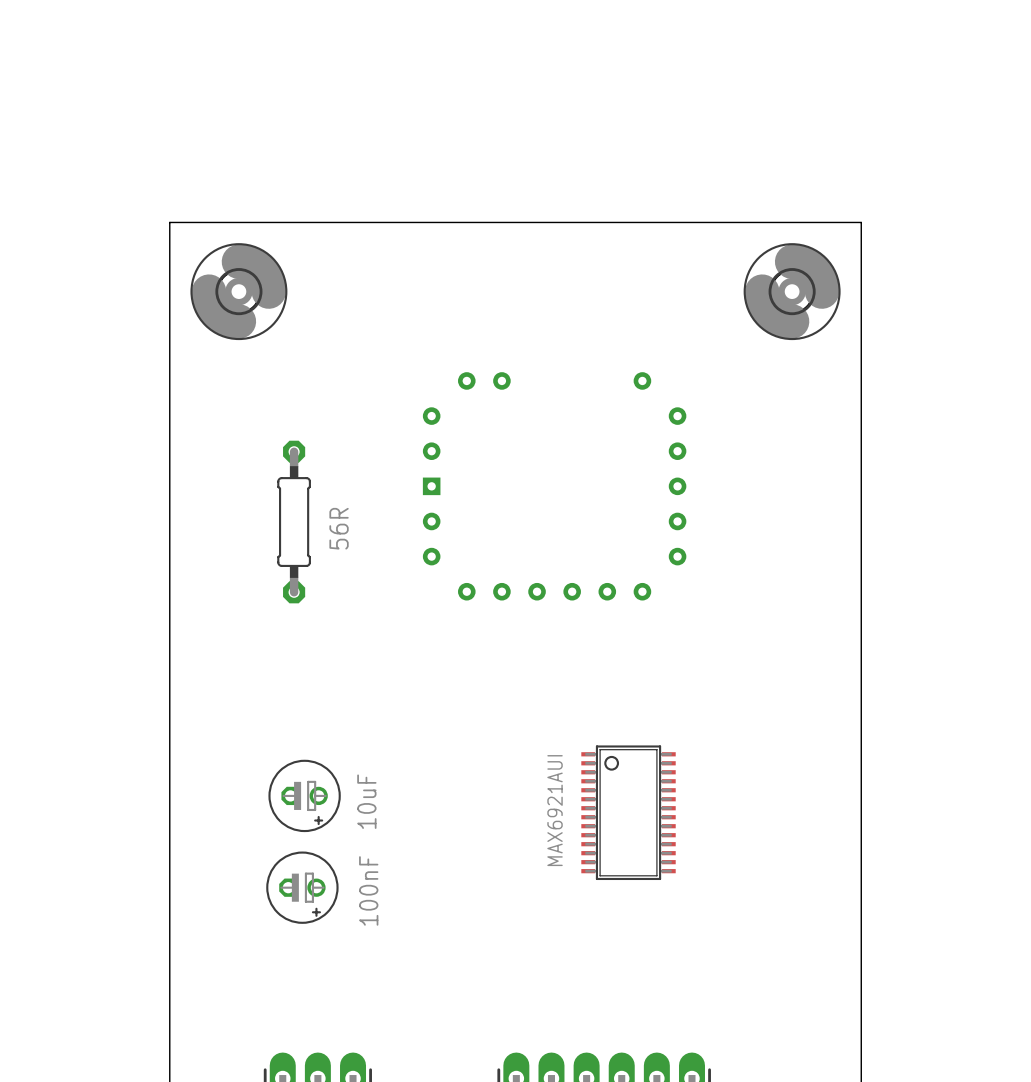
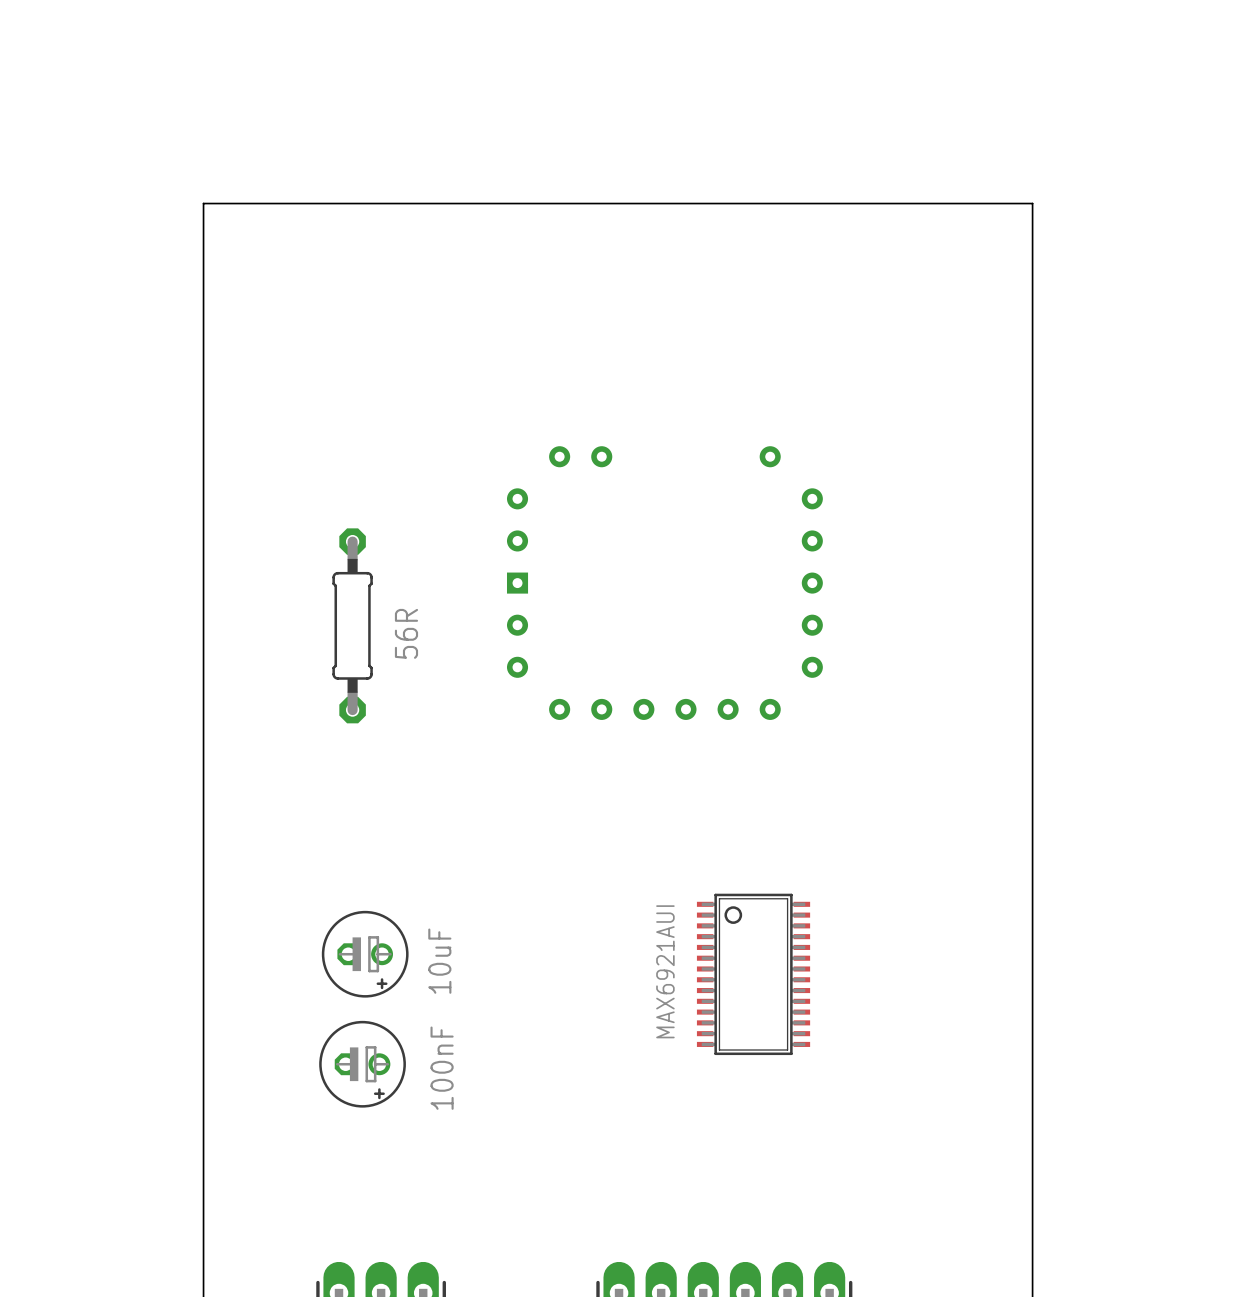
board edge: (169, 222) (861, 222) -> (203, 266) (203, 203) (1032, 203) (1032, 266)
part: (238, 291) -> none
part: (792, 291) -> none

